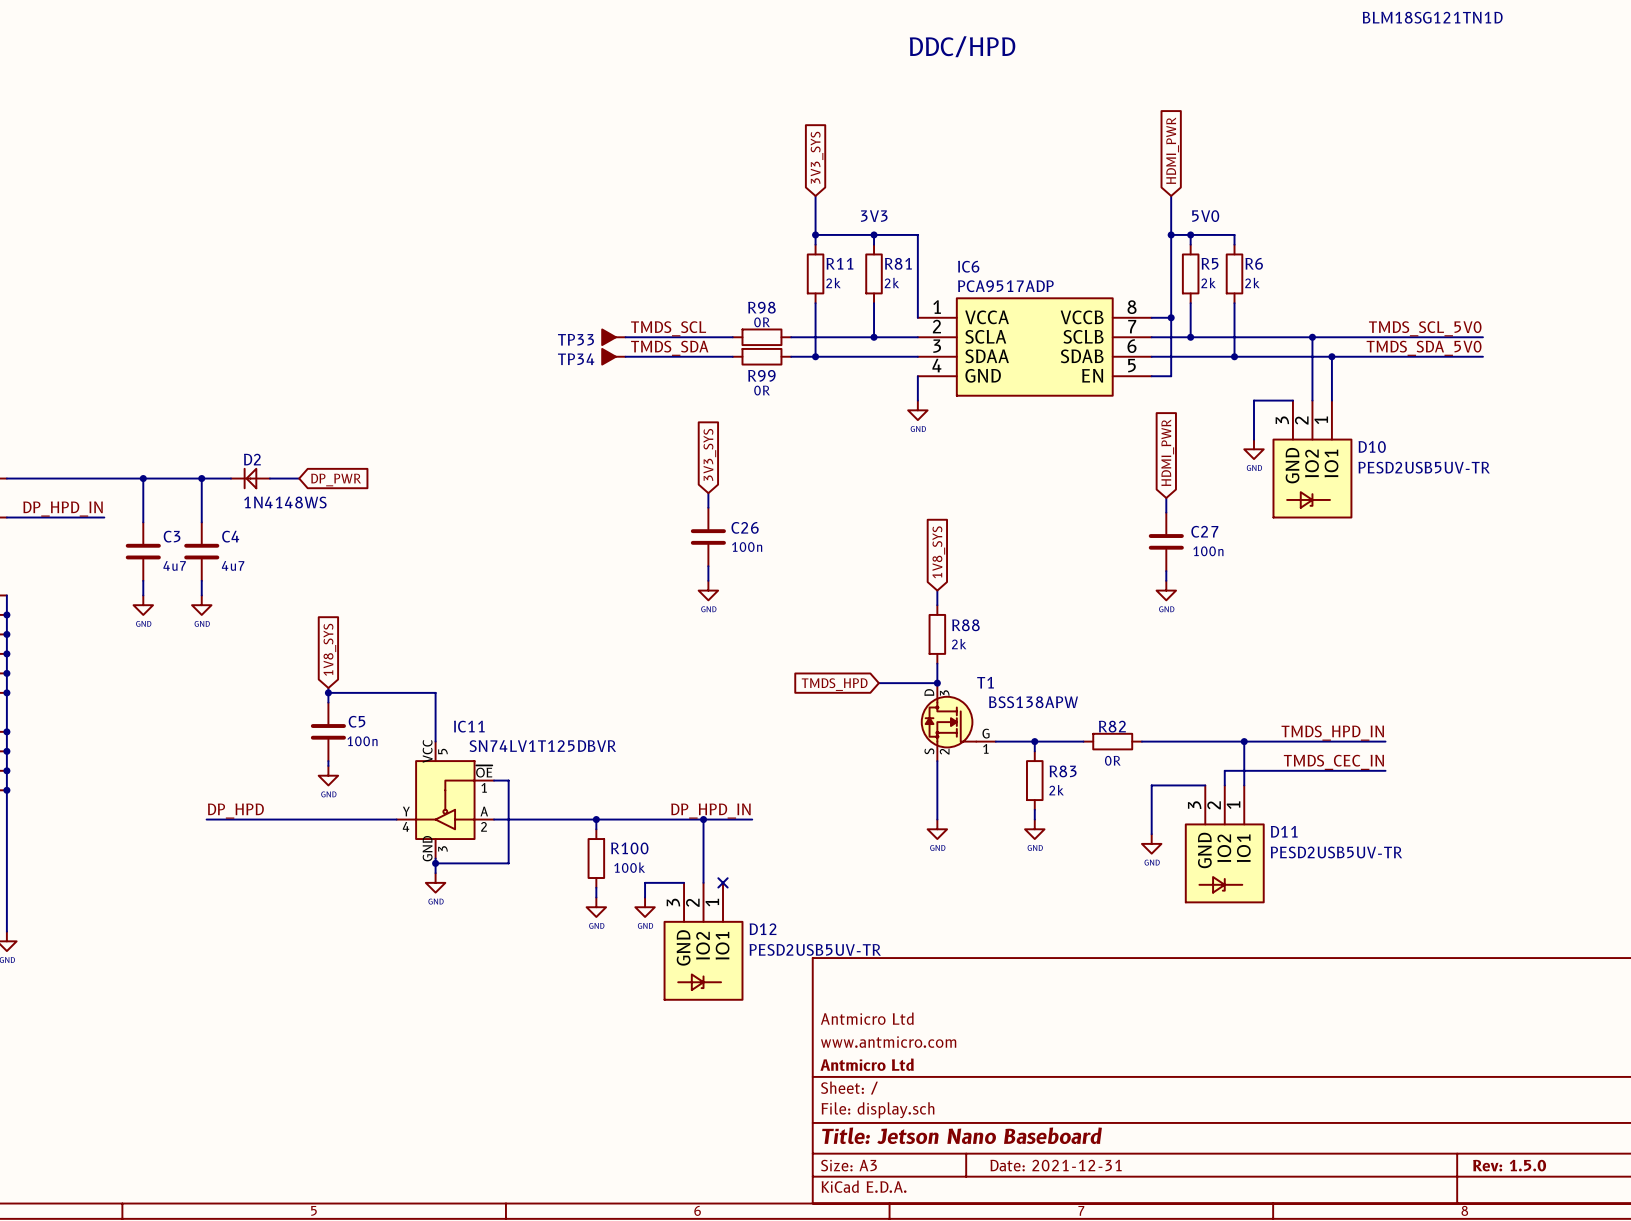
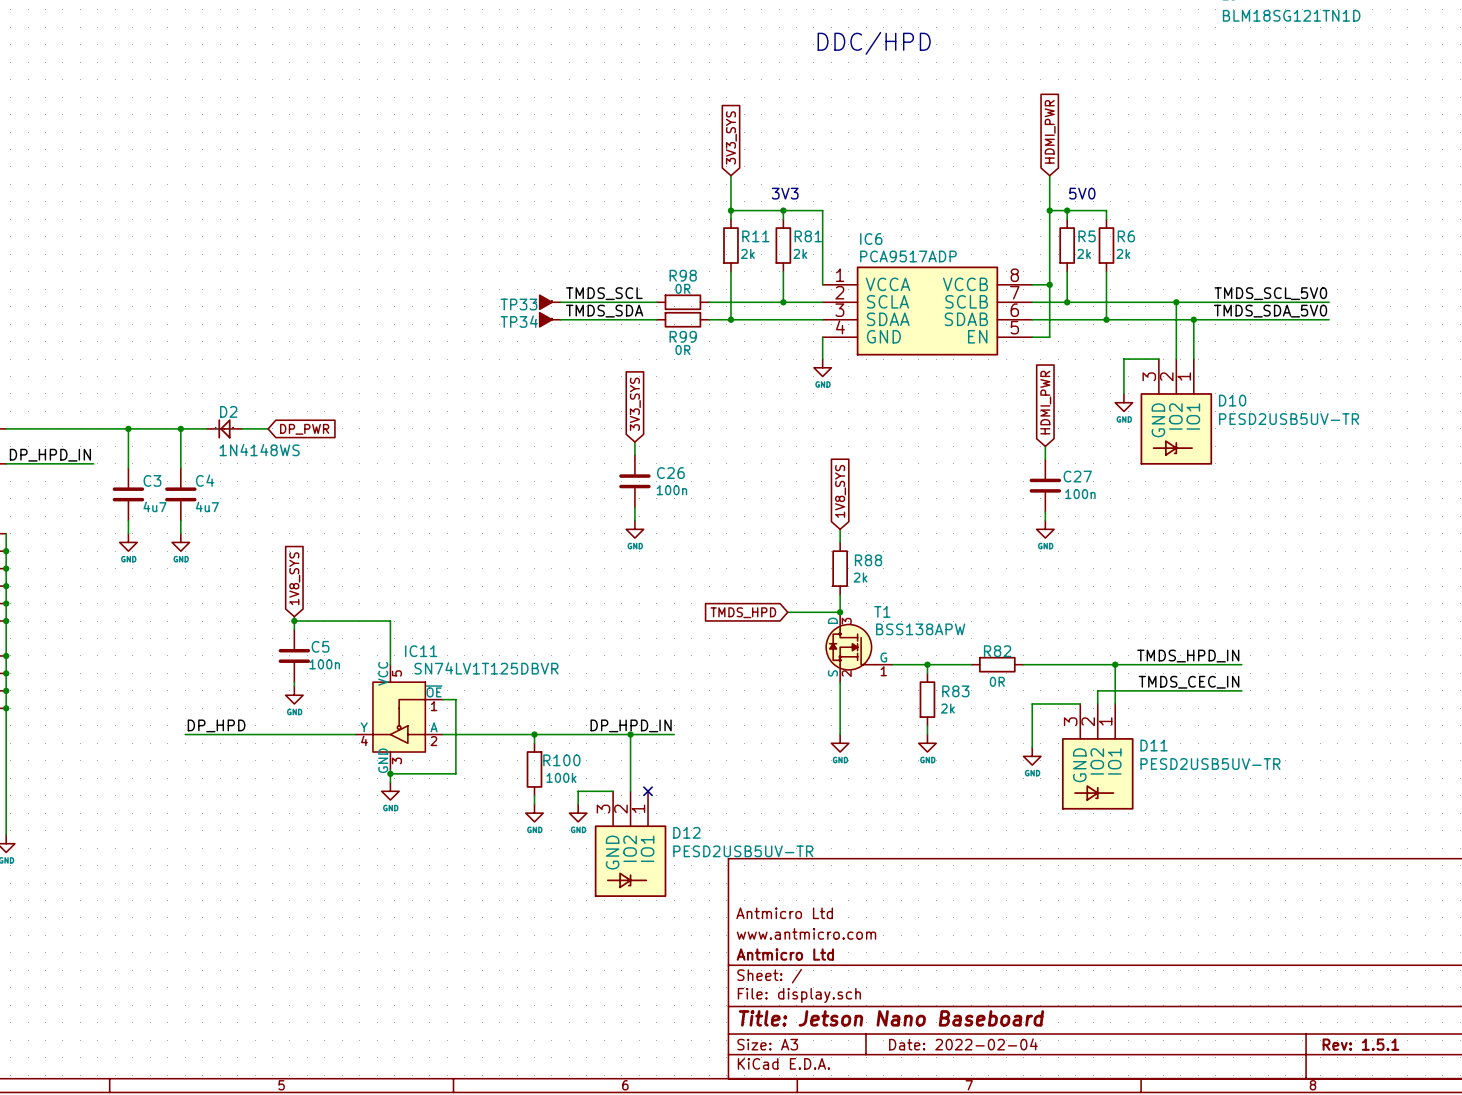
title block: Date: 2021-12-31 (1056, 1165) -> Date: 2022-02-04 (963, 1044)
title block: Rev: 1.5.0 (1509, 1165) -> Rev: 1.5.1 (1360, 1044)

